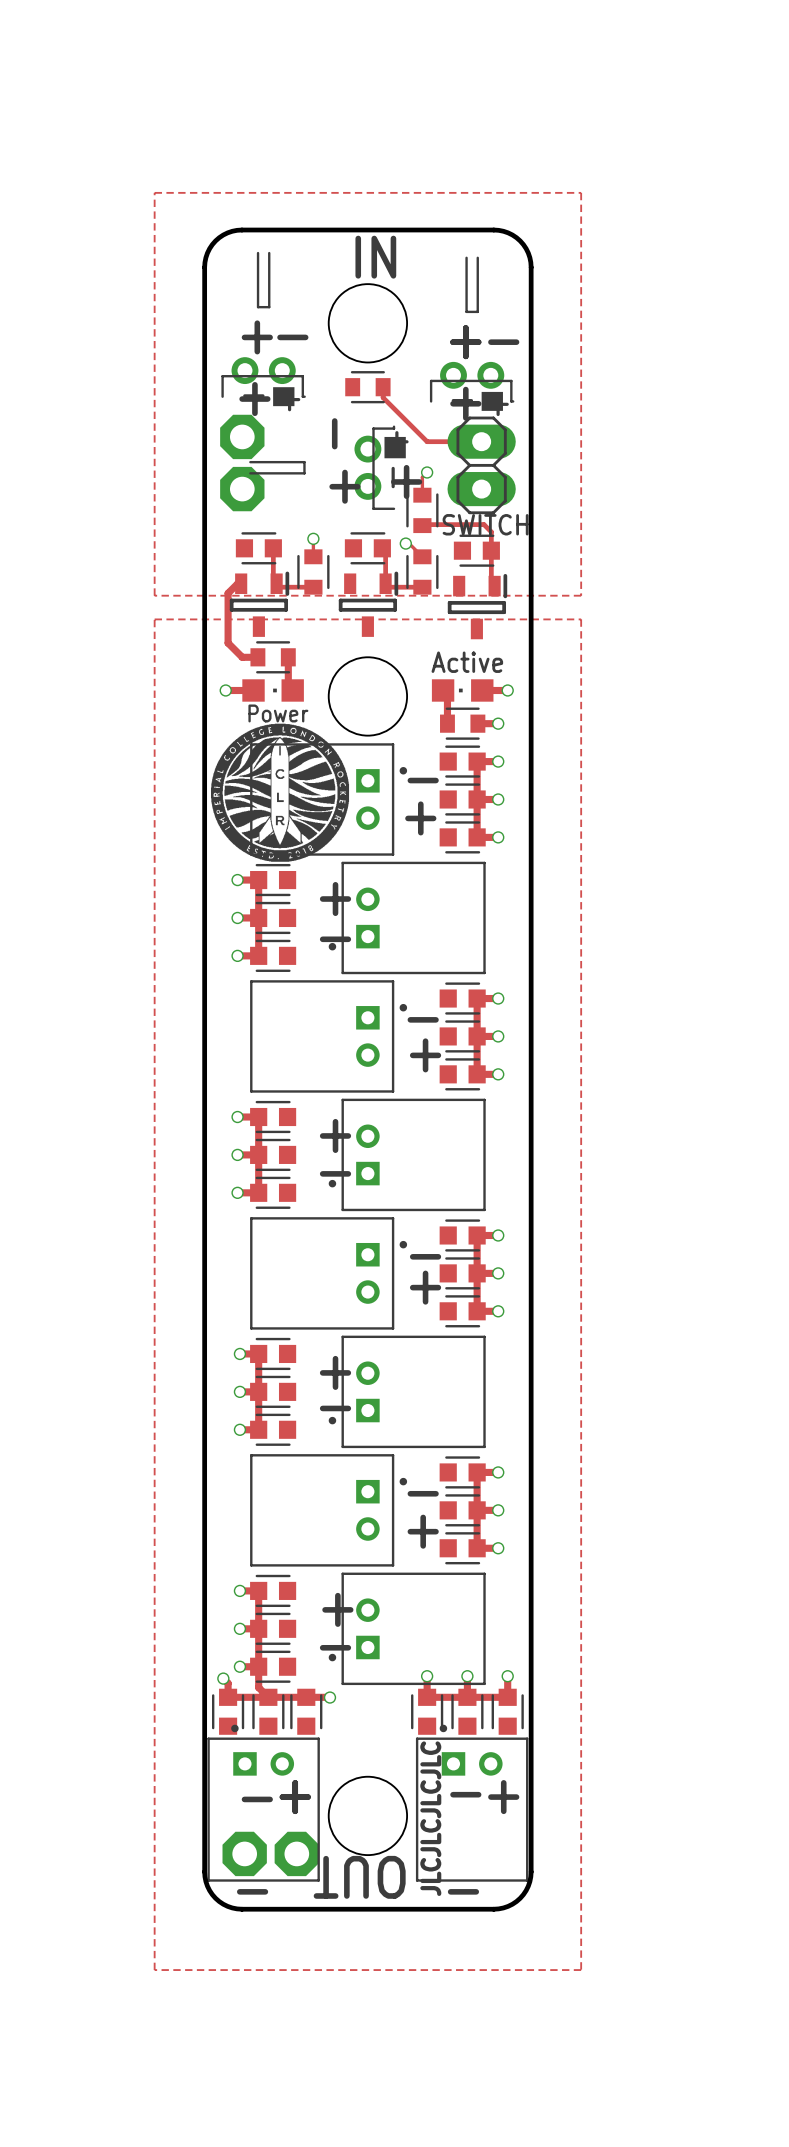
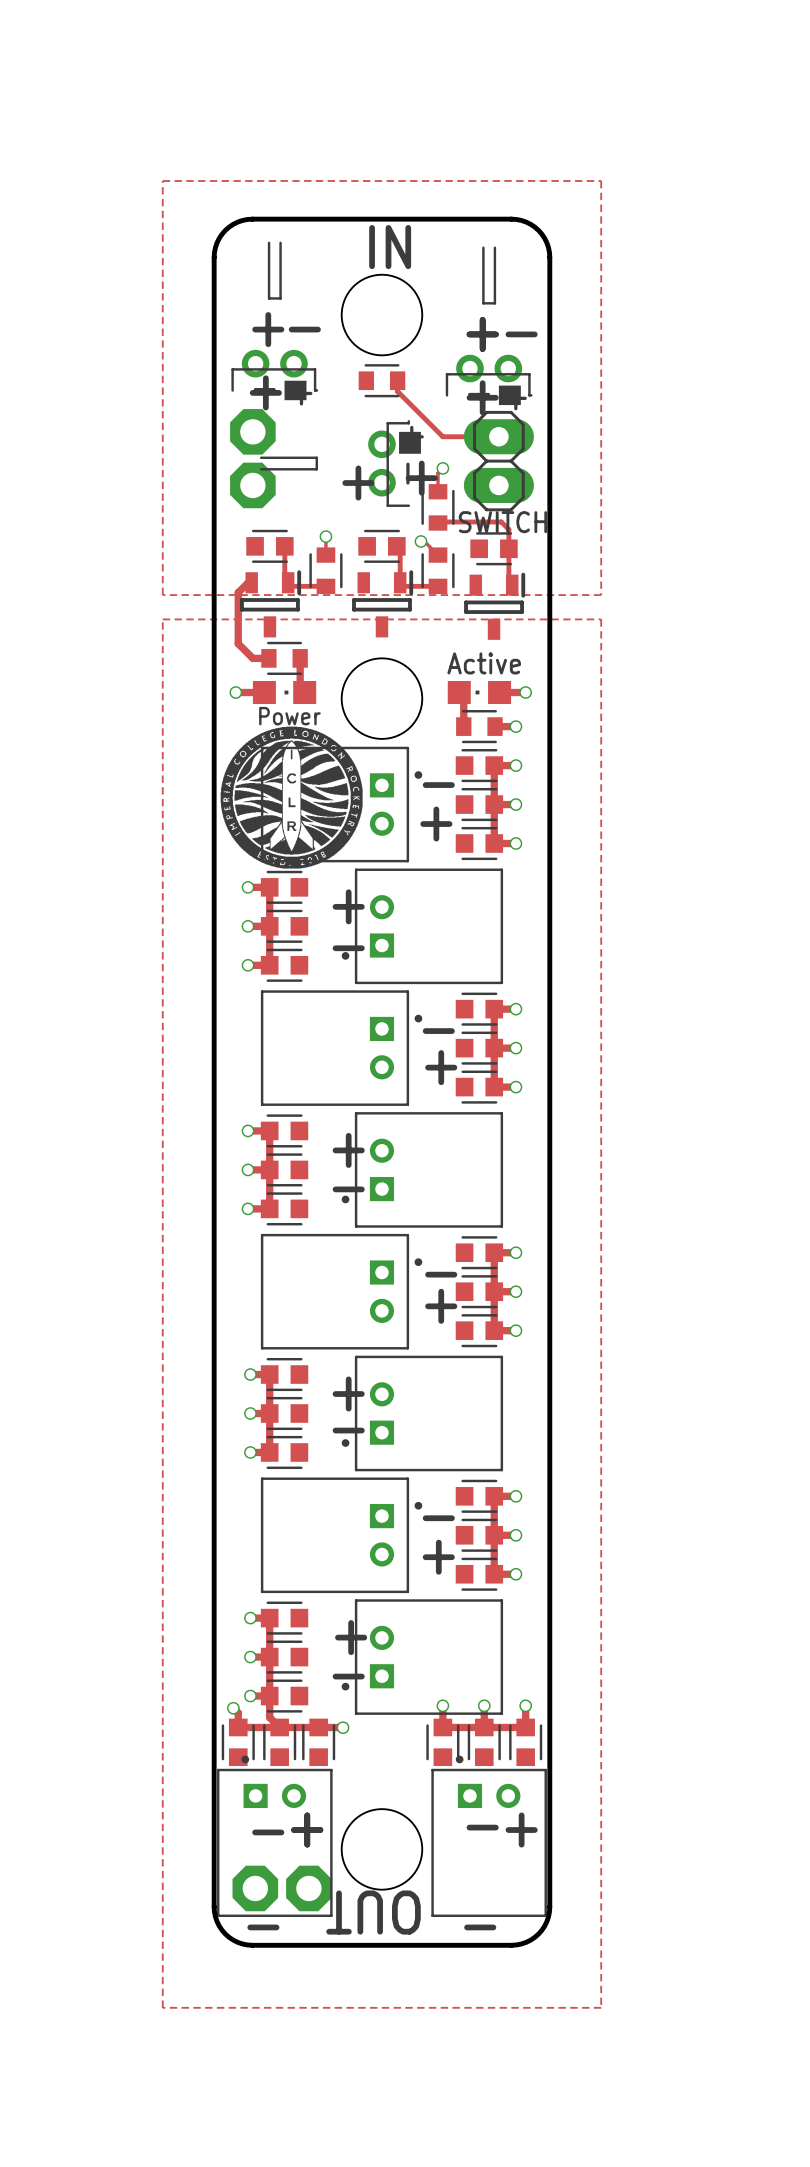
text: - (334, 433) -> none
text: JLCJLCJLCJLC (430, 1818) -> none

